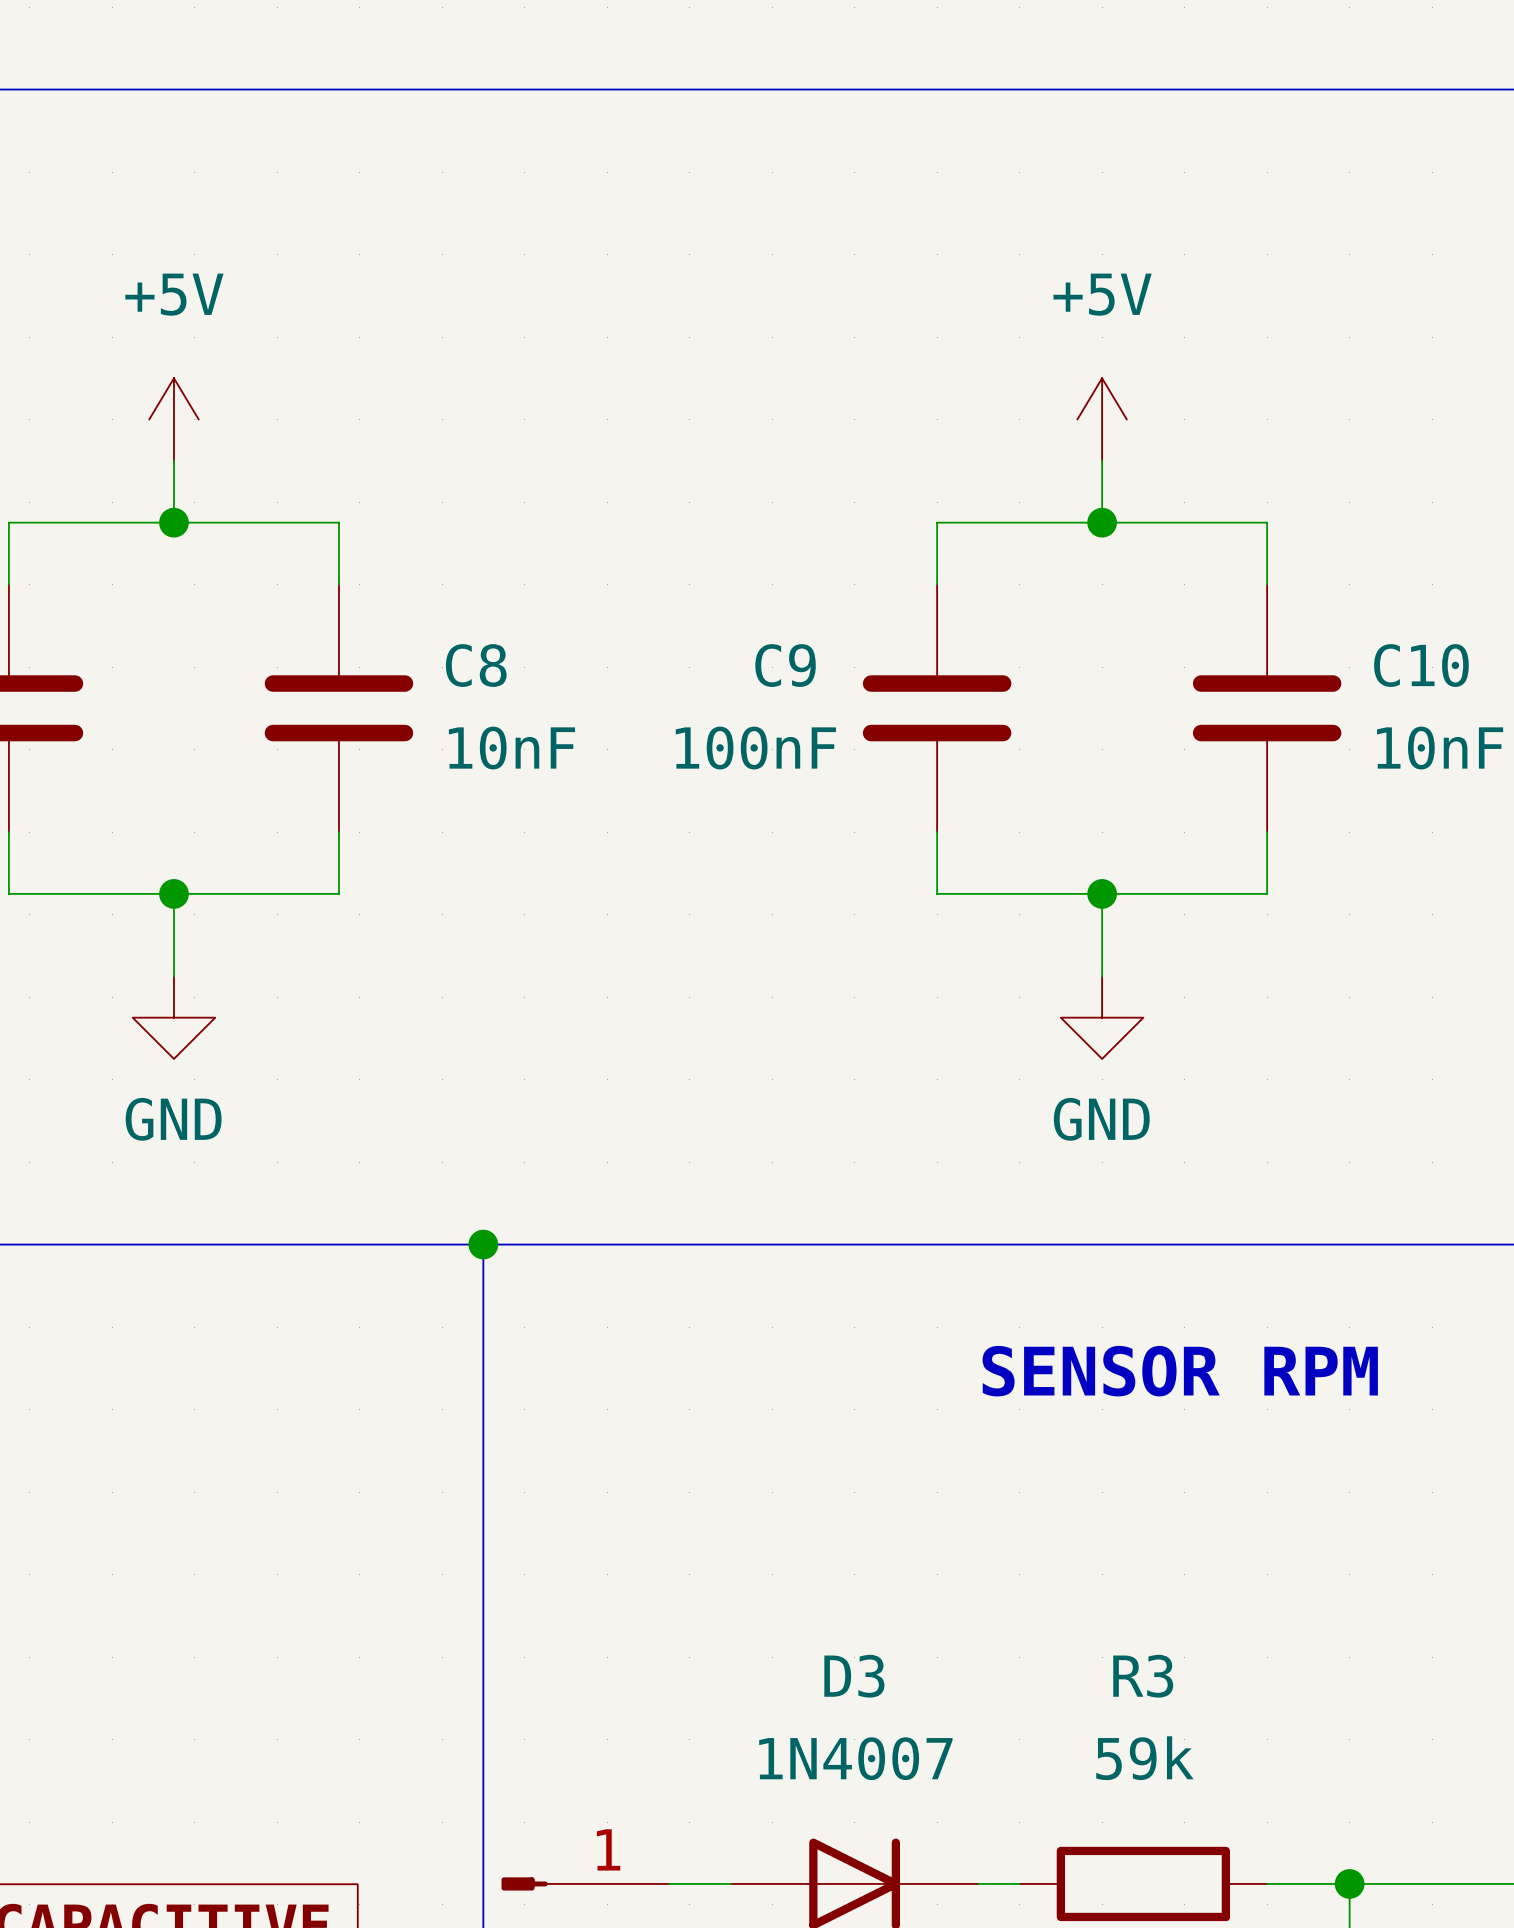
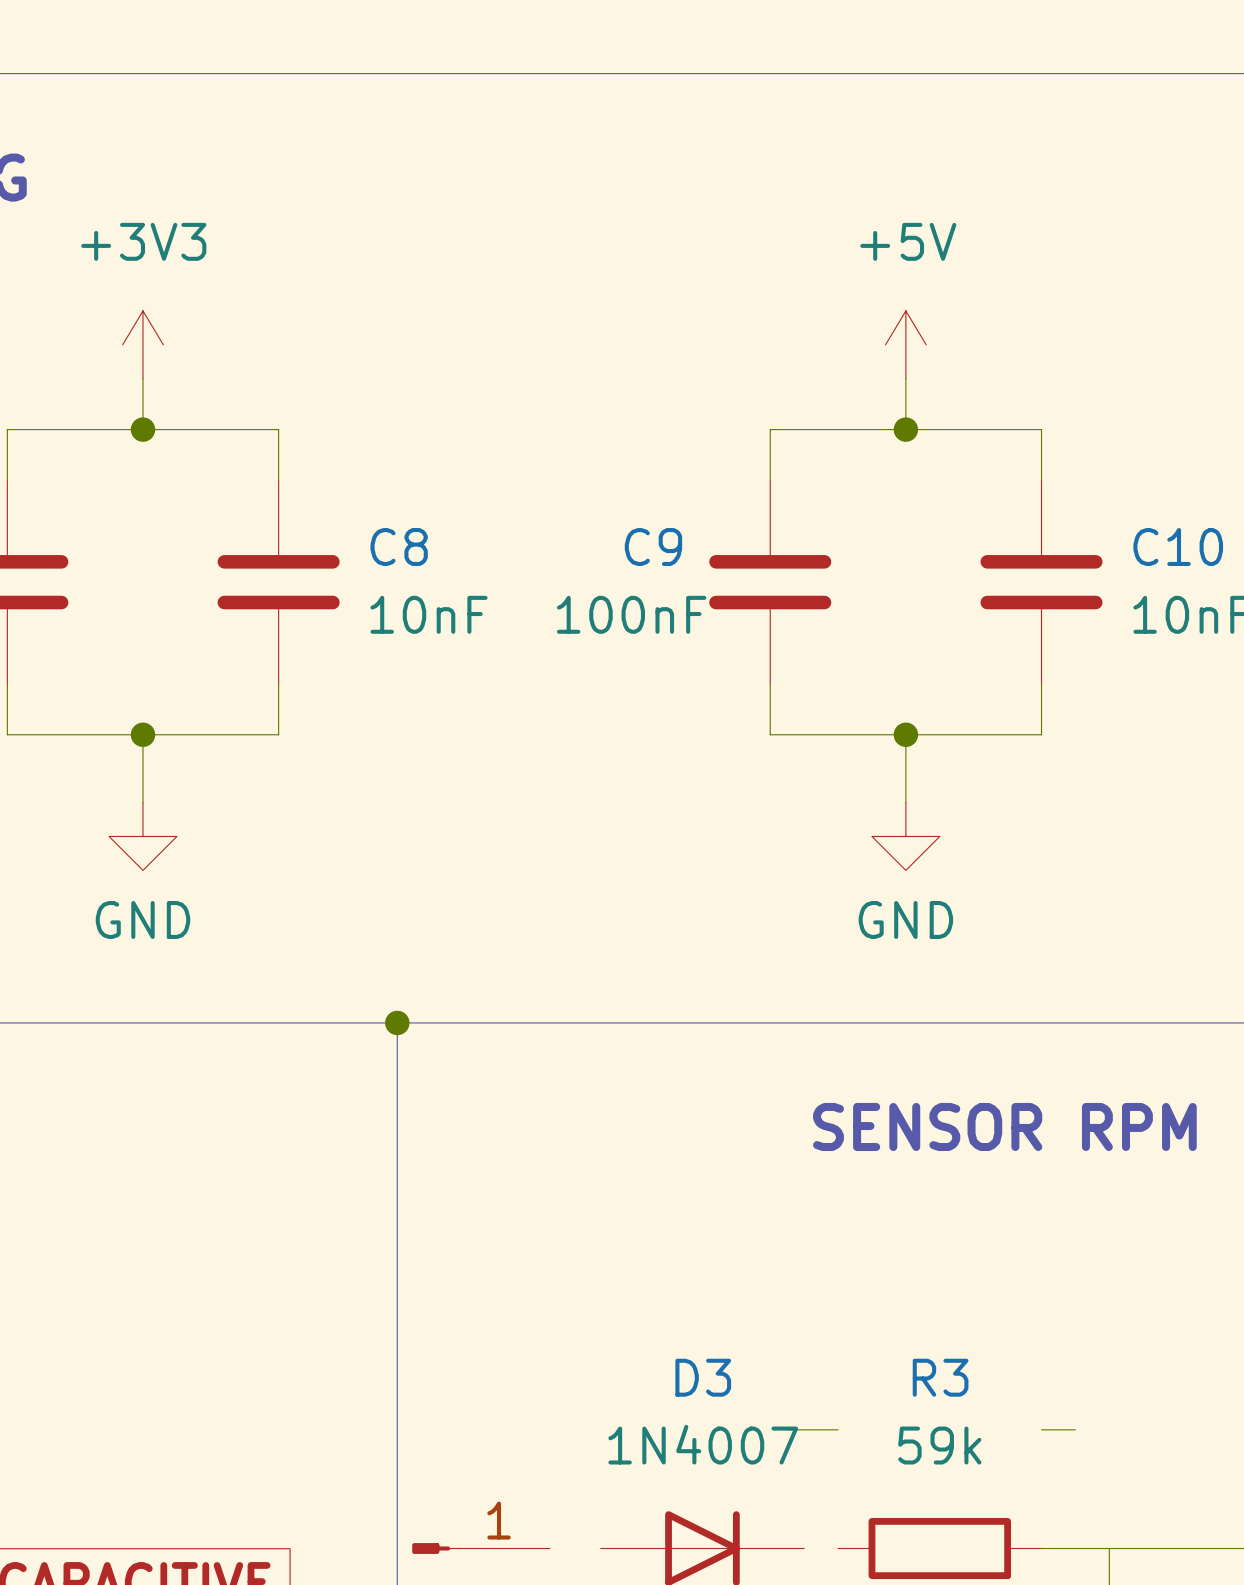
power symbol: +5V (173, 419) -> +3V3 (142, 344)
wire: (668, 1883) (730, 1883) -> (787, 1429) (838, 1429)
wire: (978, 1883) (1019, 1883) -> (1041, 1429) (1075, 1429)
junction: (1349, 1883) -> none

